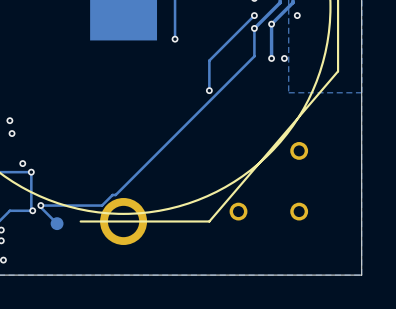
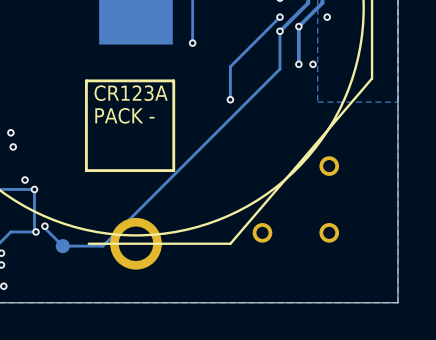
track: (254, 56) (115, 195) (112, 195) (102, 205) (40, 205) -> (279, 61) (279, 69) (102, 246) (62, 246)
line: none -> (173, 80) (86, 80) (86, 170) (173, 170) (173, 80)
text: none -> CR123A (131, 93)
text: none -> PACK - (124, 115)

